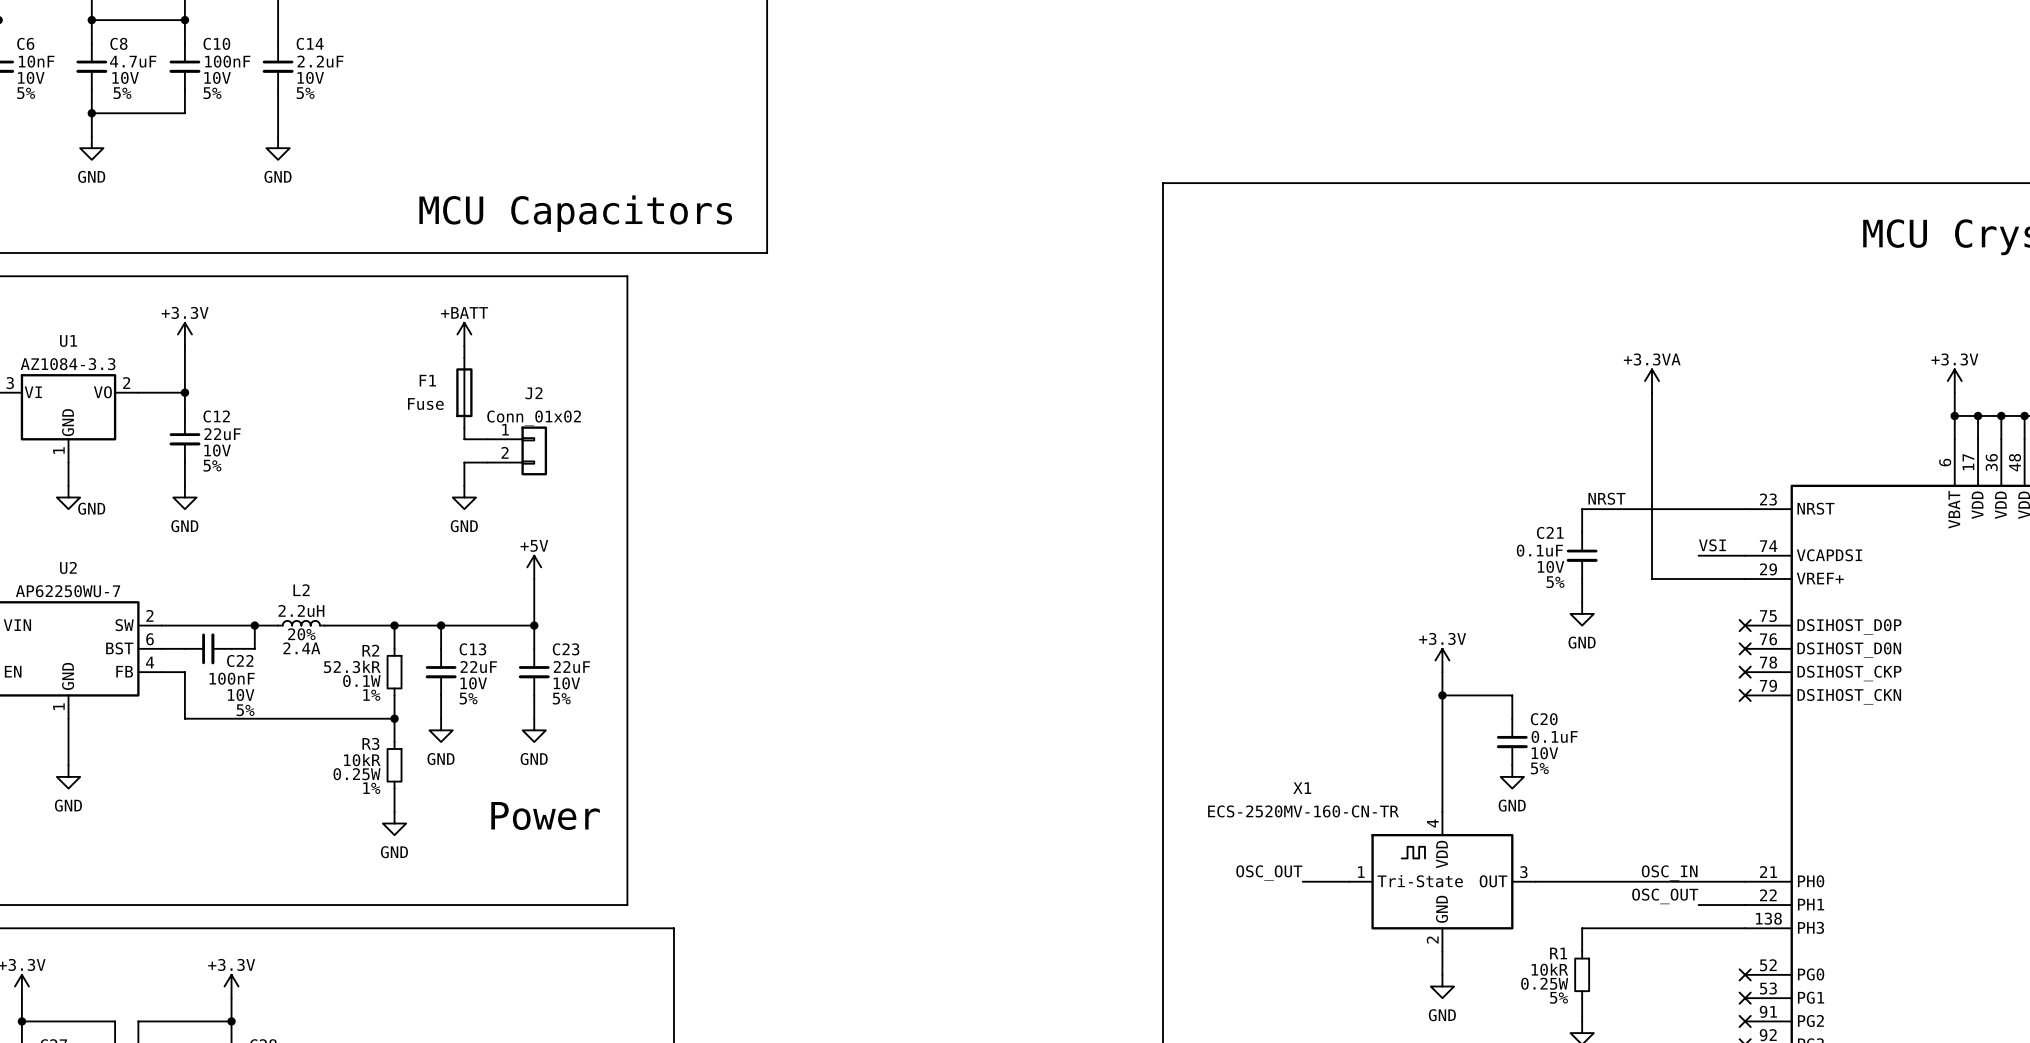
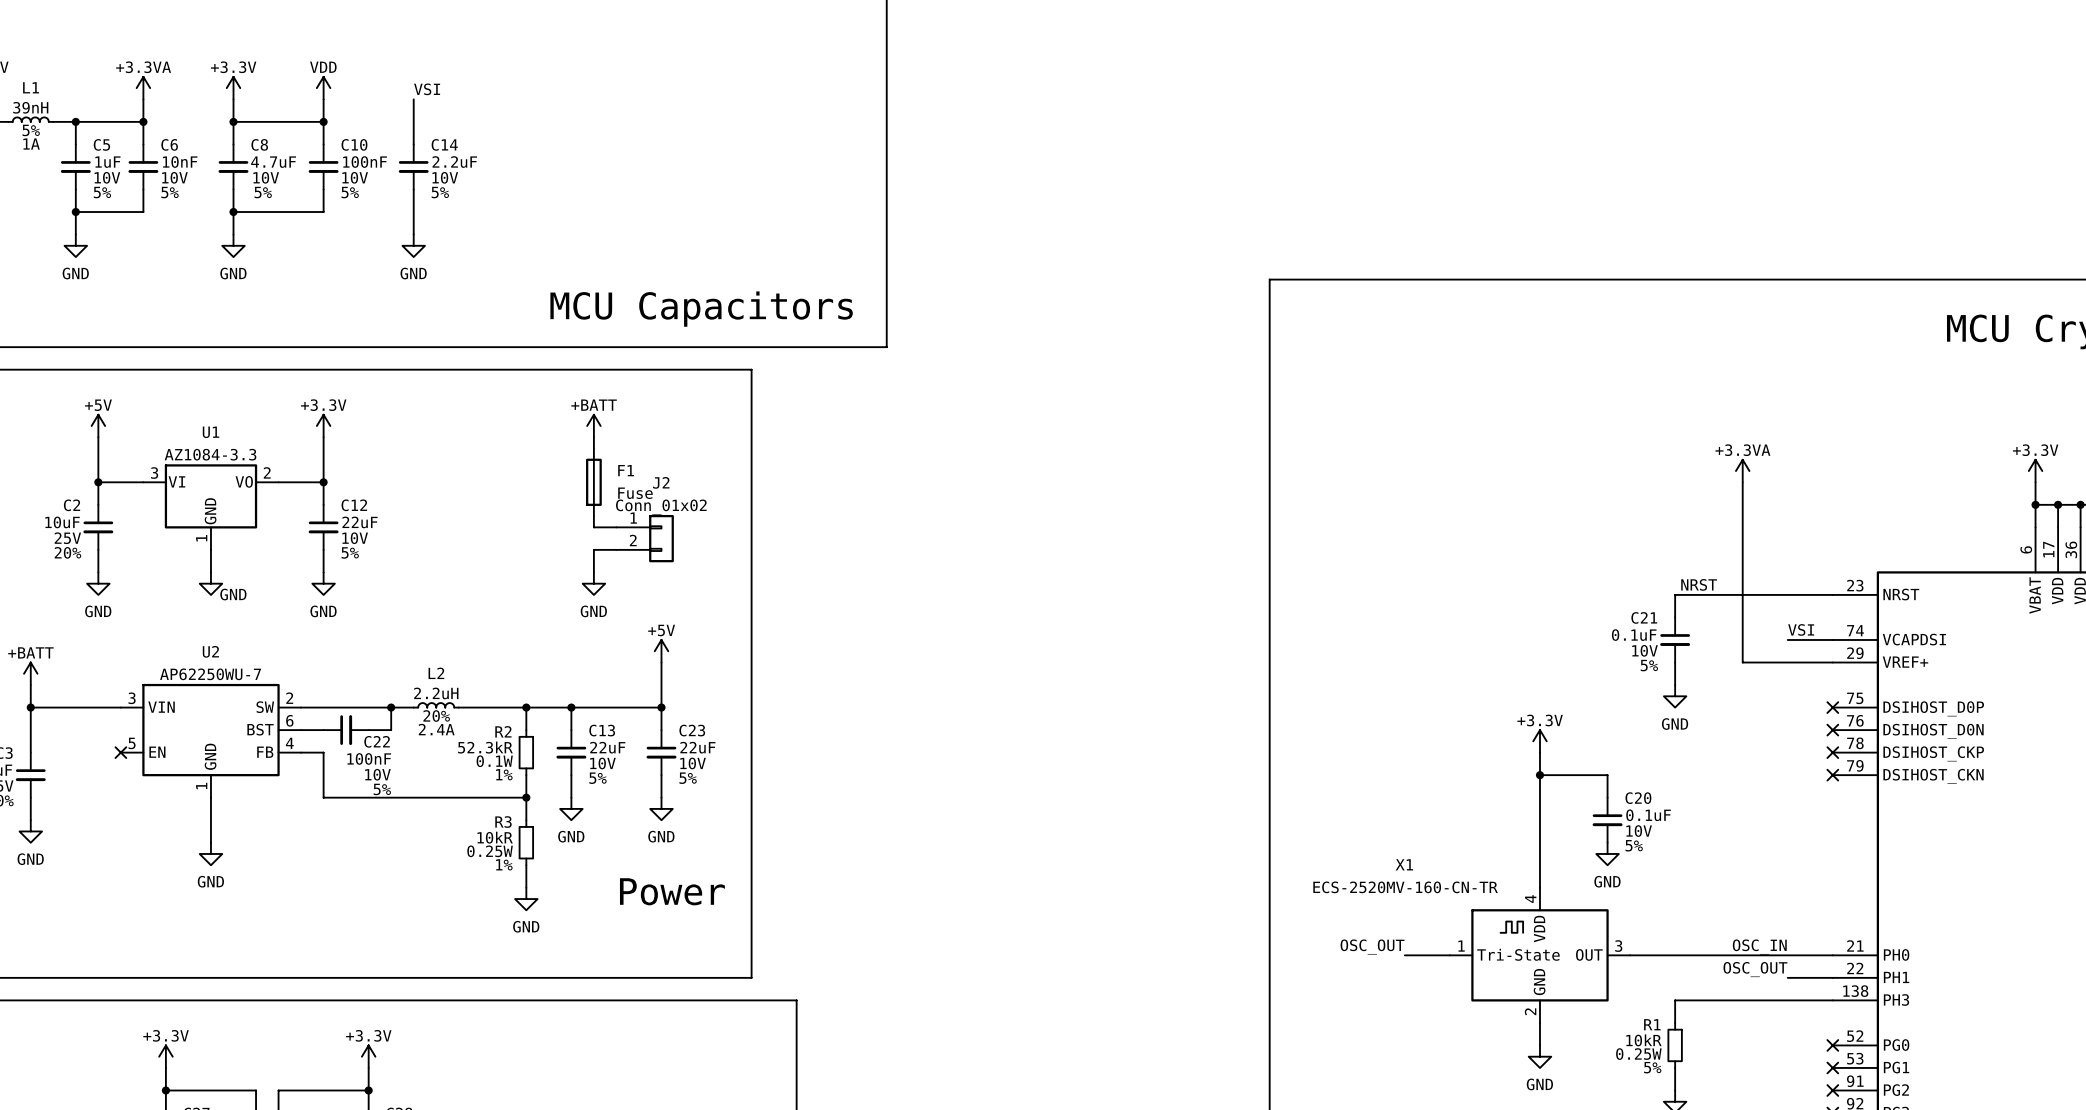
F1 name position: F1 (427, 380) -> F1 (626, 470)
F1 value position: Fuse (425, 404) -> Fuse (635, 493)

